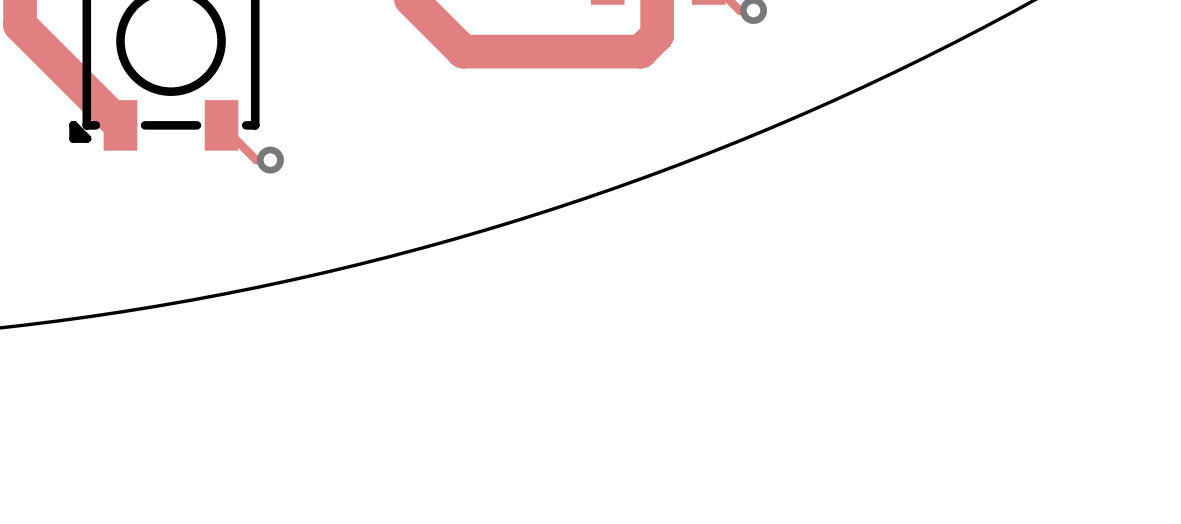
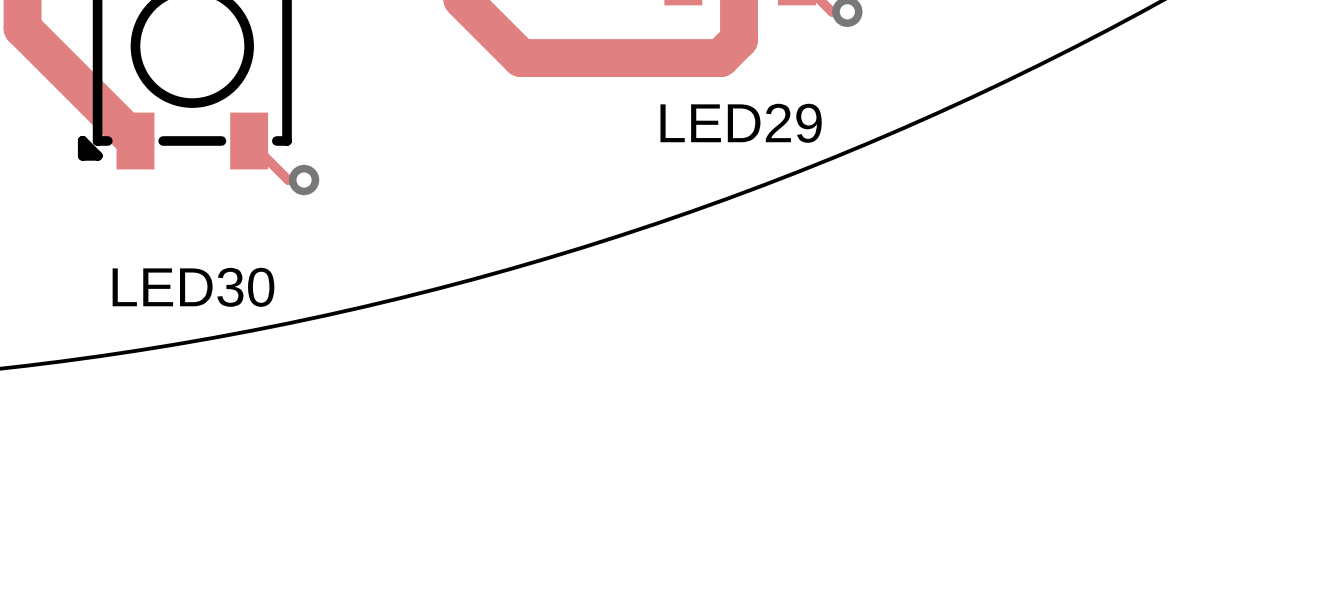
LED29 name: none -> LED29 (741, 123)
LED30 name: none -> LED30 (193, 287)

